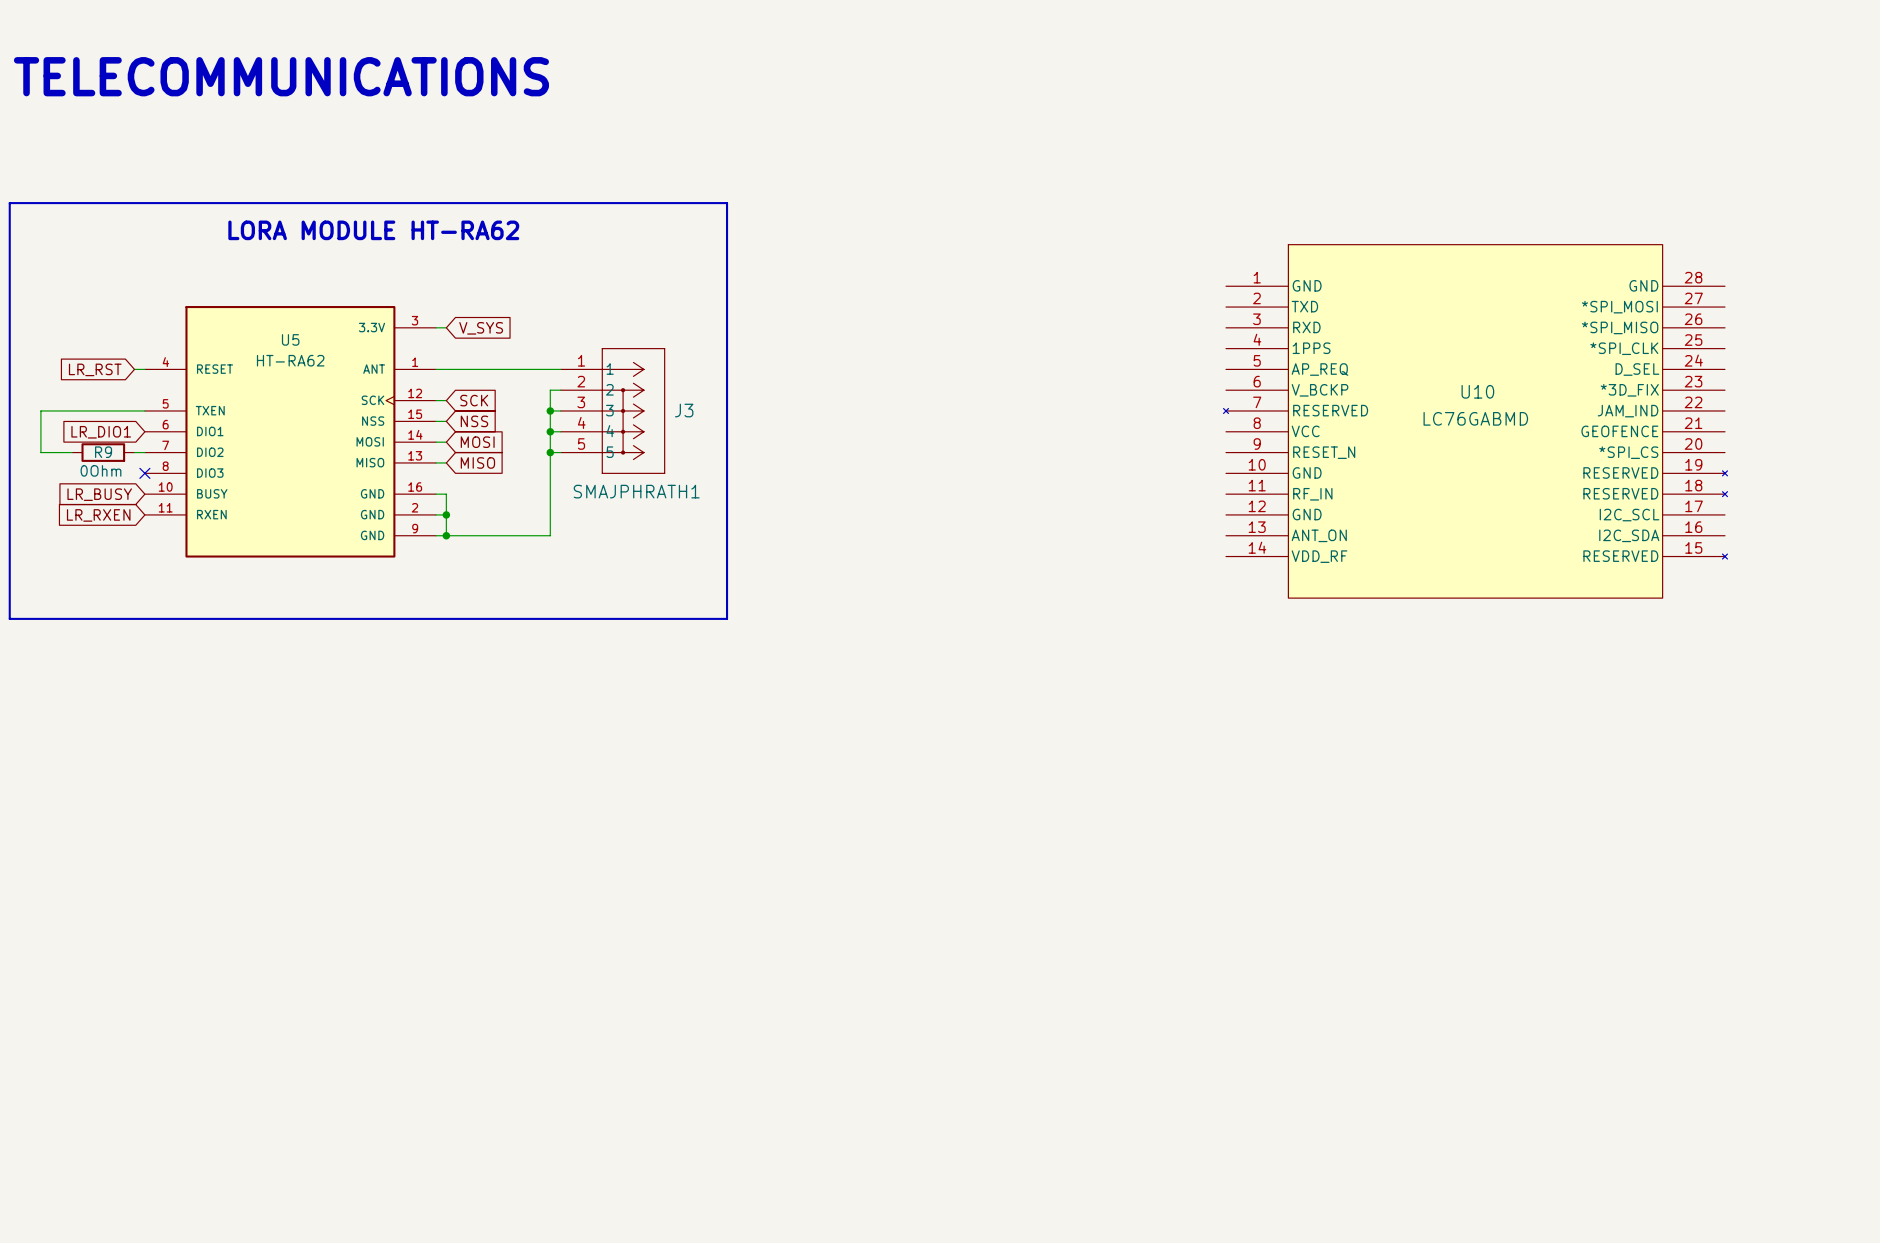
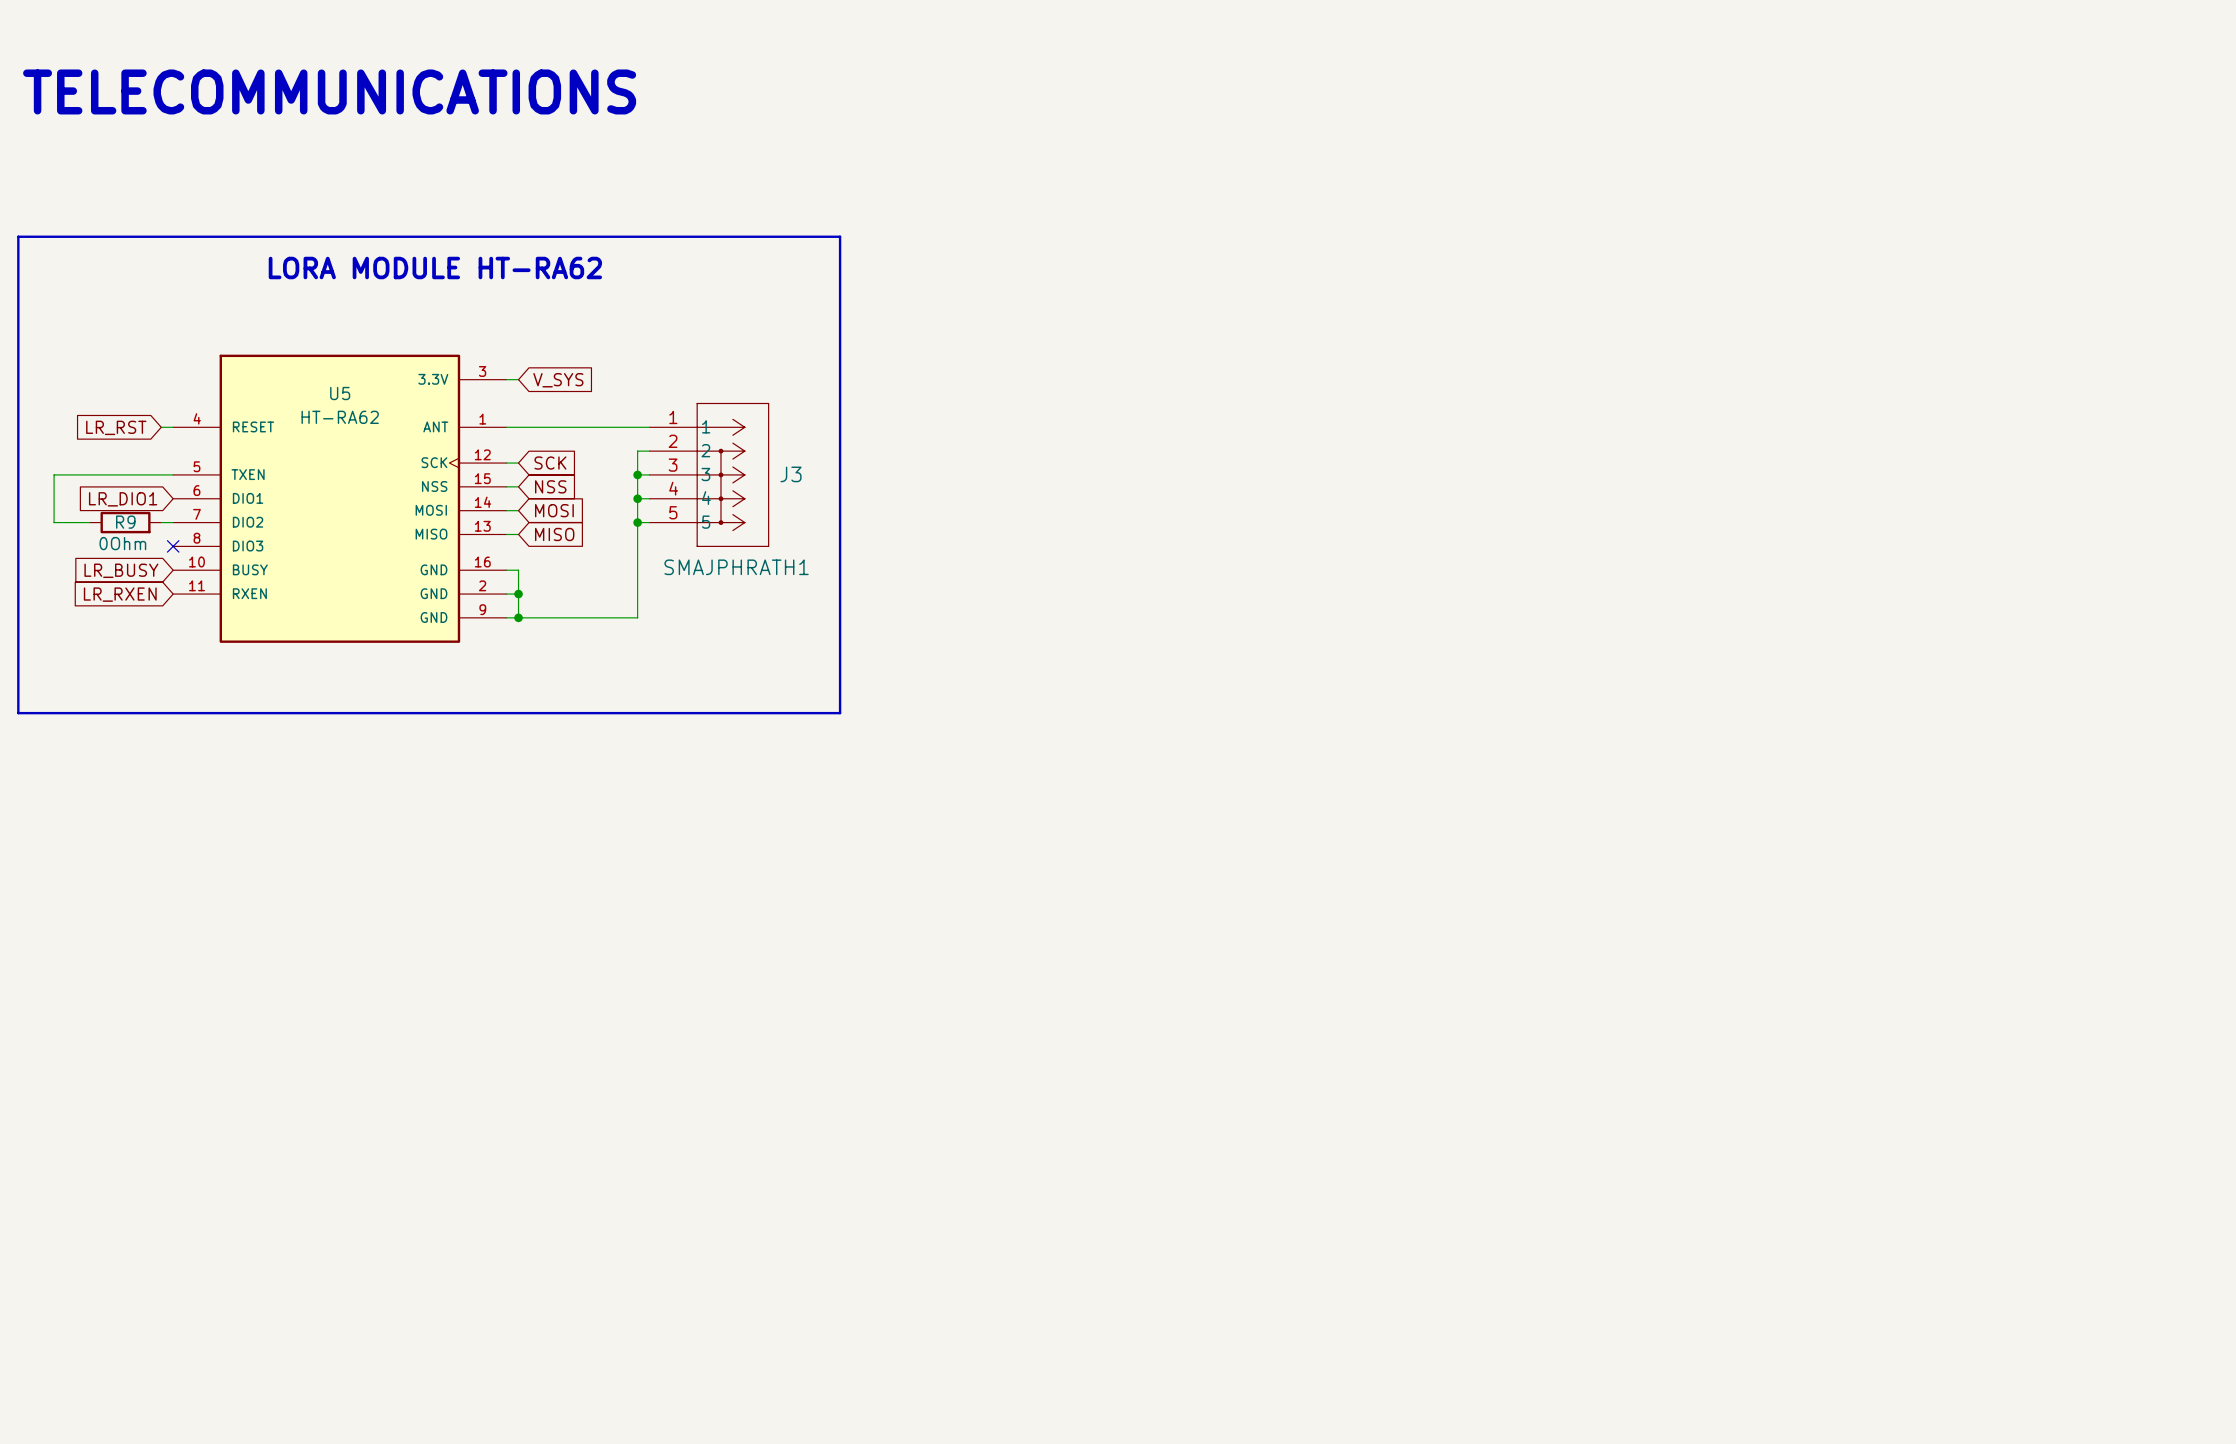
U10: LC76GABMD (1475, 421) -> none

